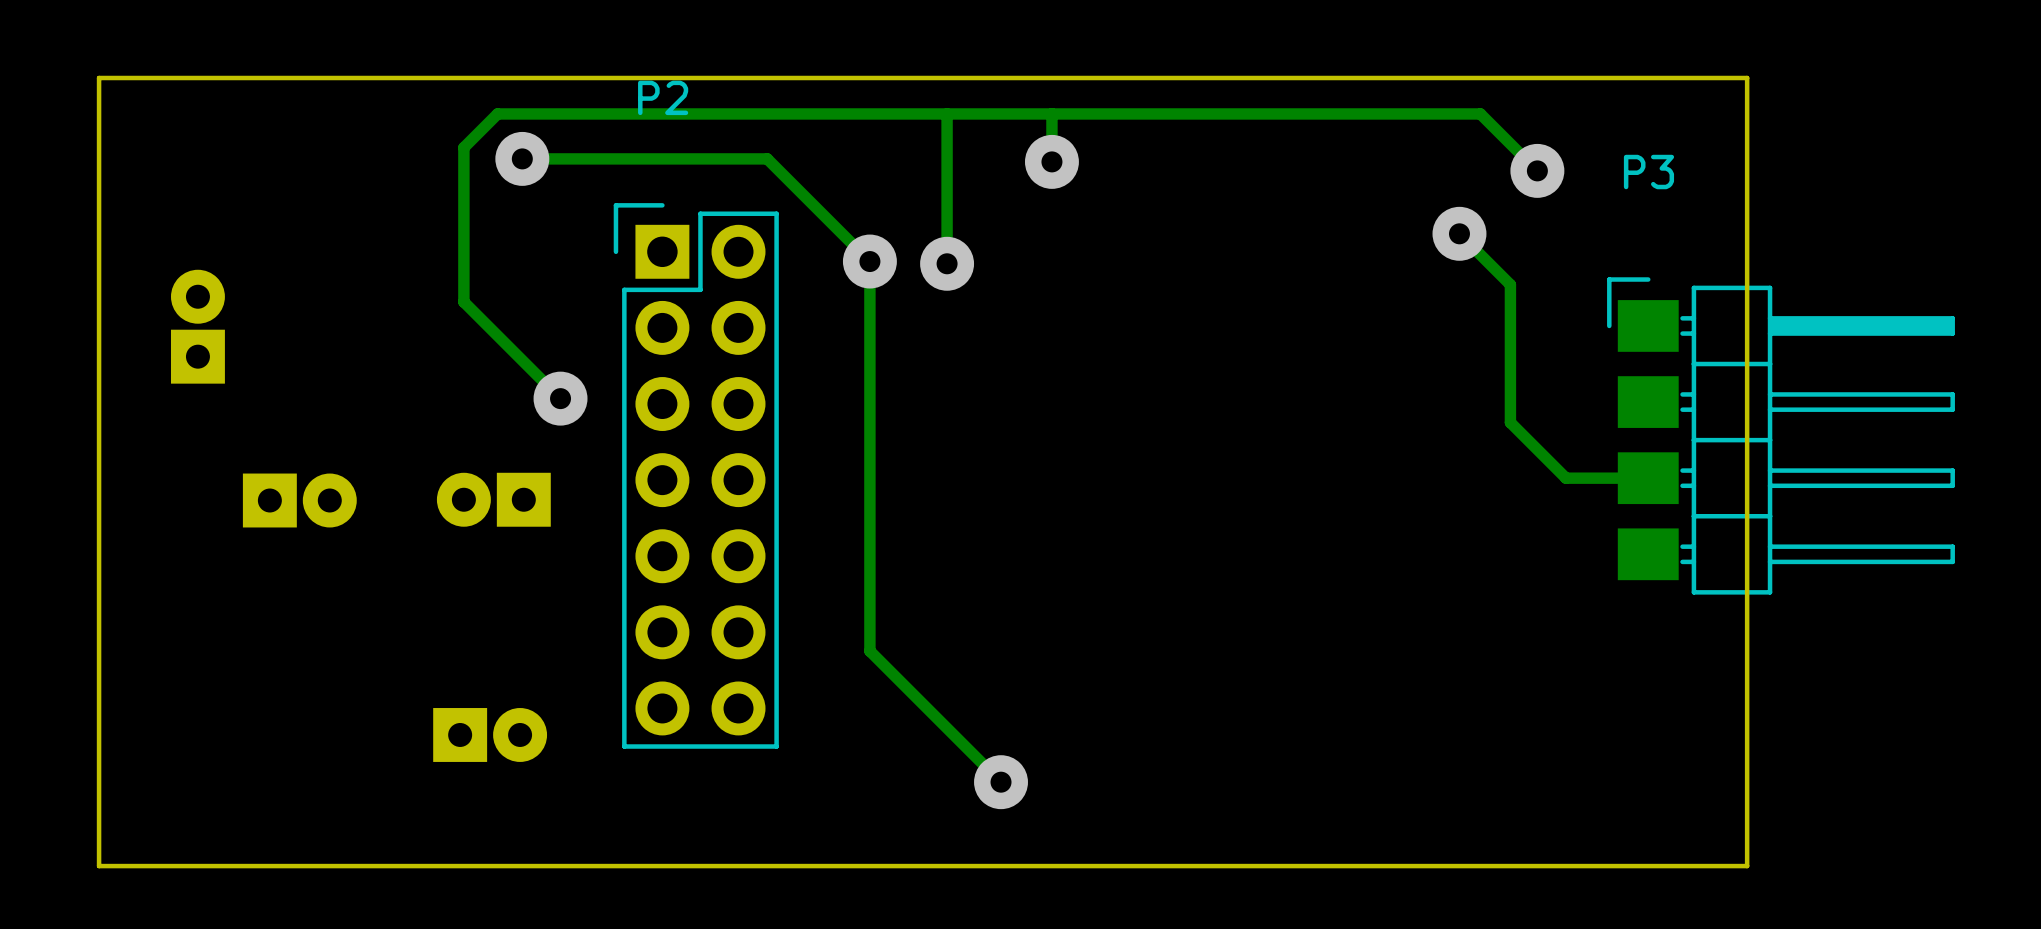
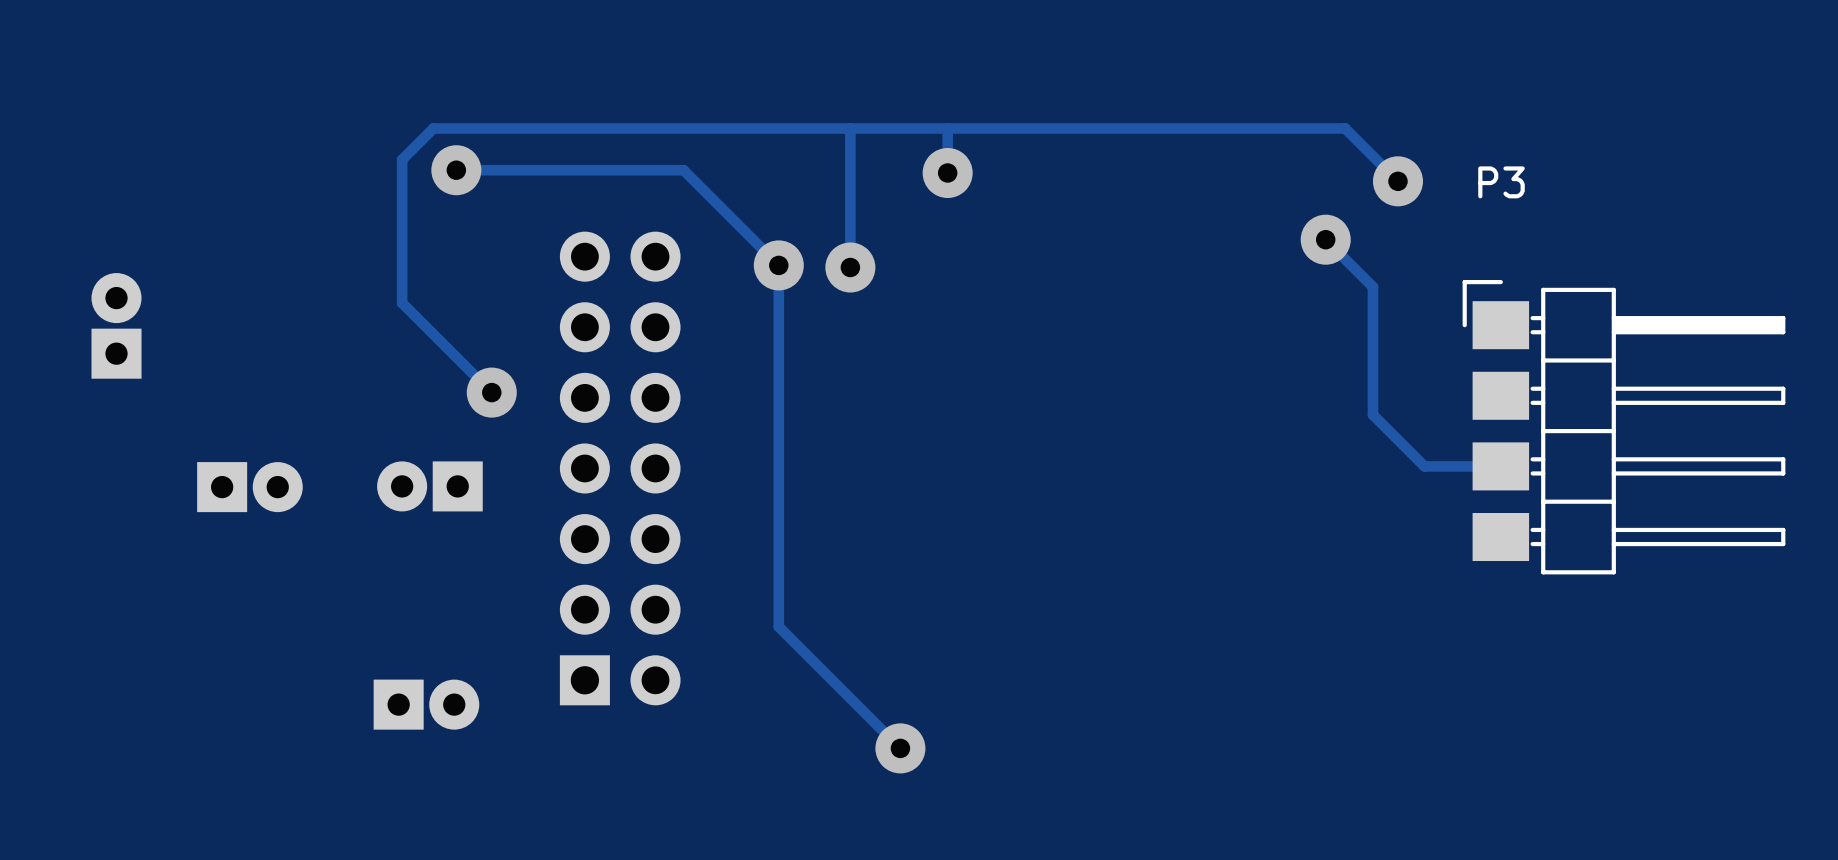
board edge: (1747, 78) (1747, 866) (99, 866) (99, 78) (1747, 78) -> none
part position: (197, 326) -> (116, 325)
P2 side: bottom (696, 475) -> top (620, 468)

